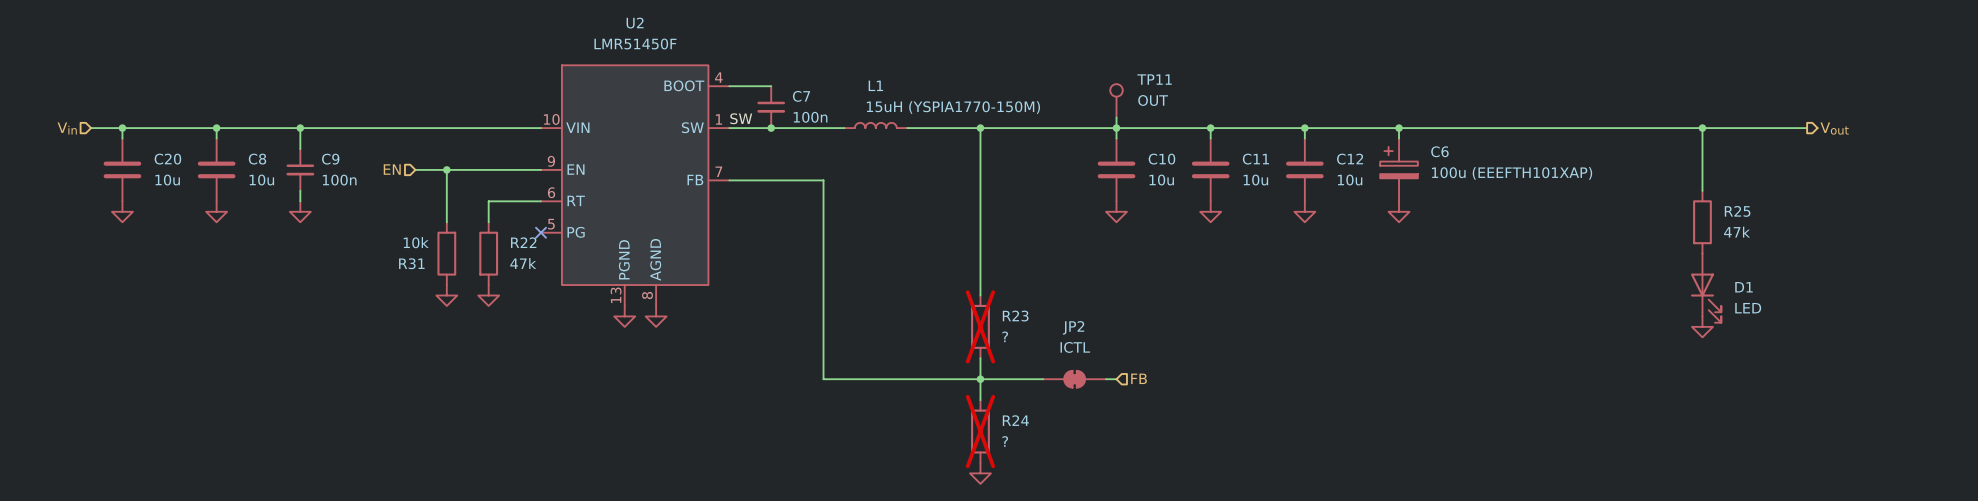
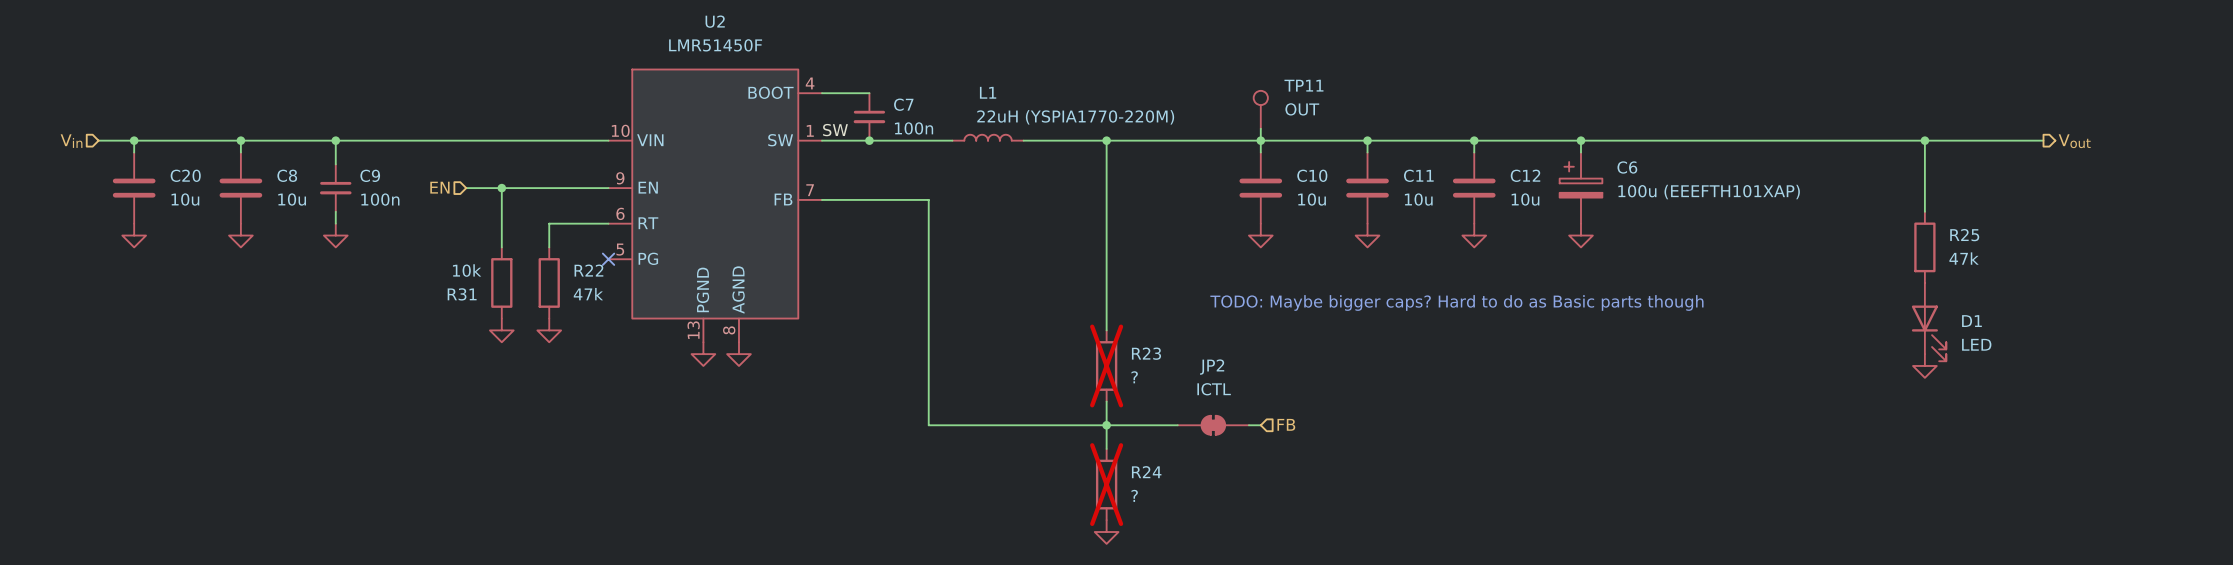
L1 value: 15uH (YSPIA1770-150M) (953, 107) -> 22uH (YSPIA1770-220M) (1075, 117)
text: none -> TODO: Maybe bigger caps? Hard to do as Basic parts though (1456, 302)

